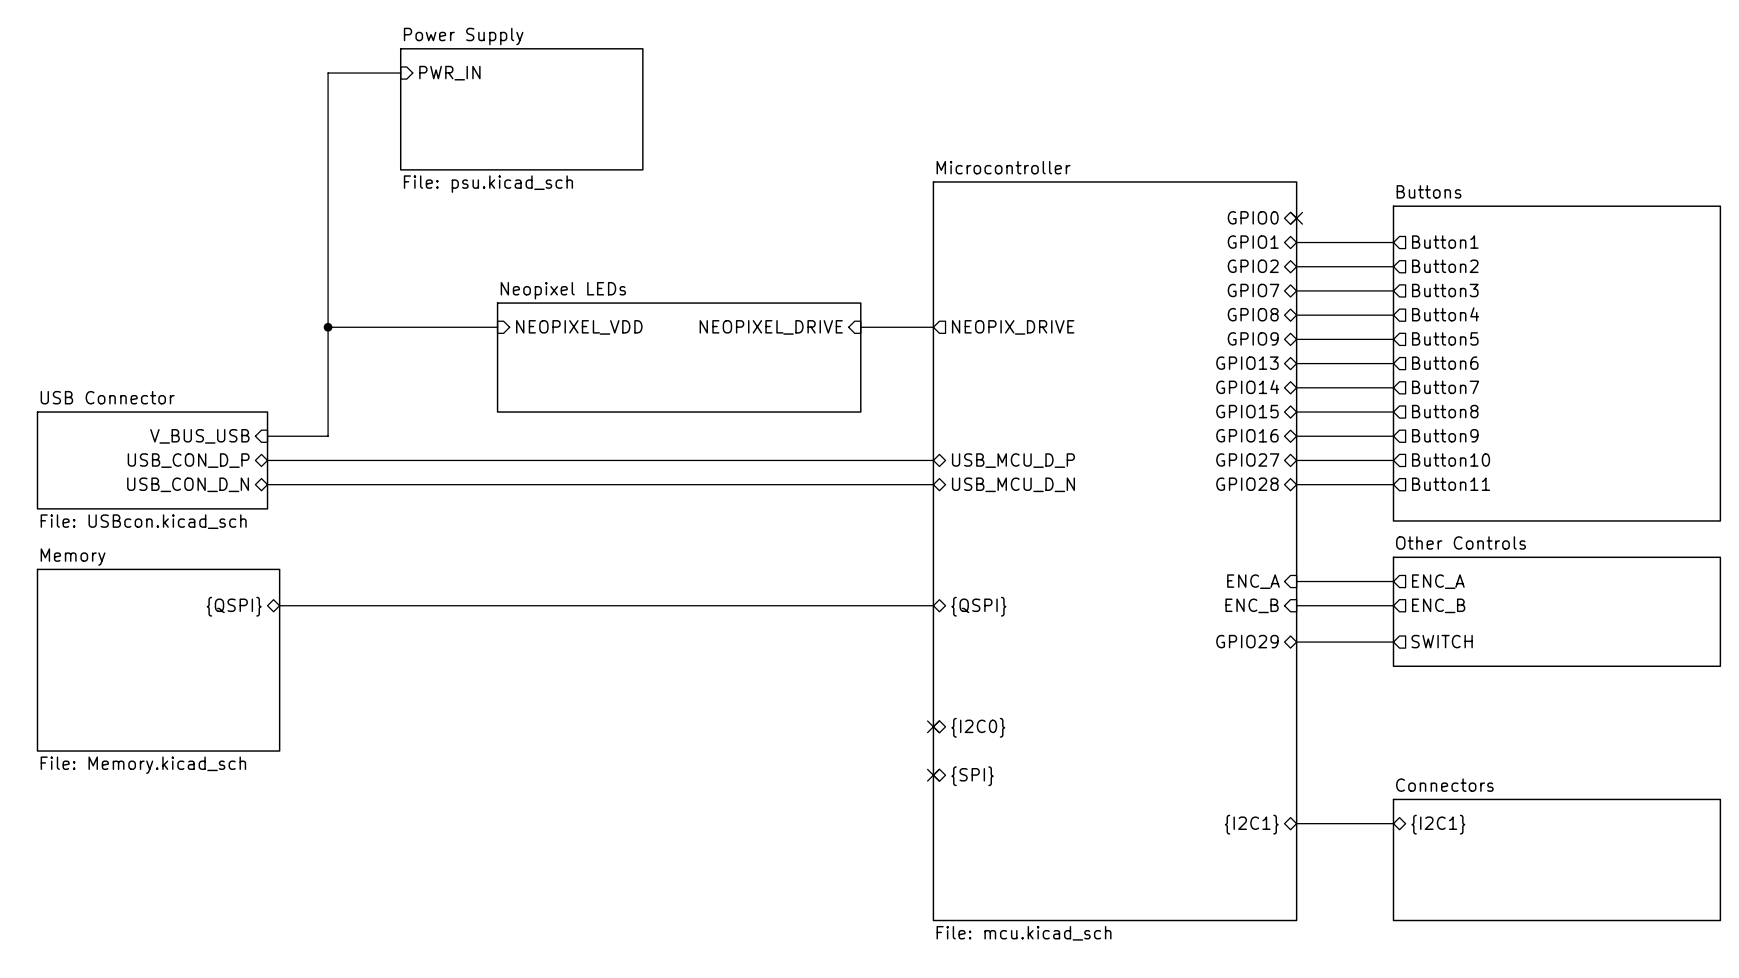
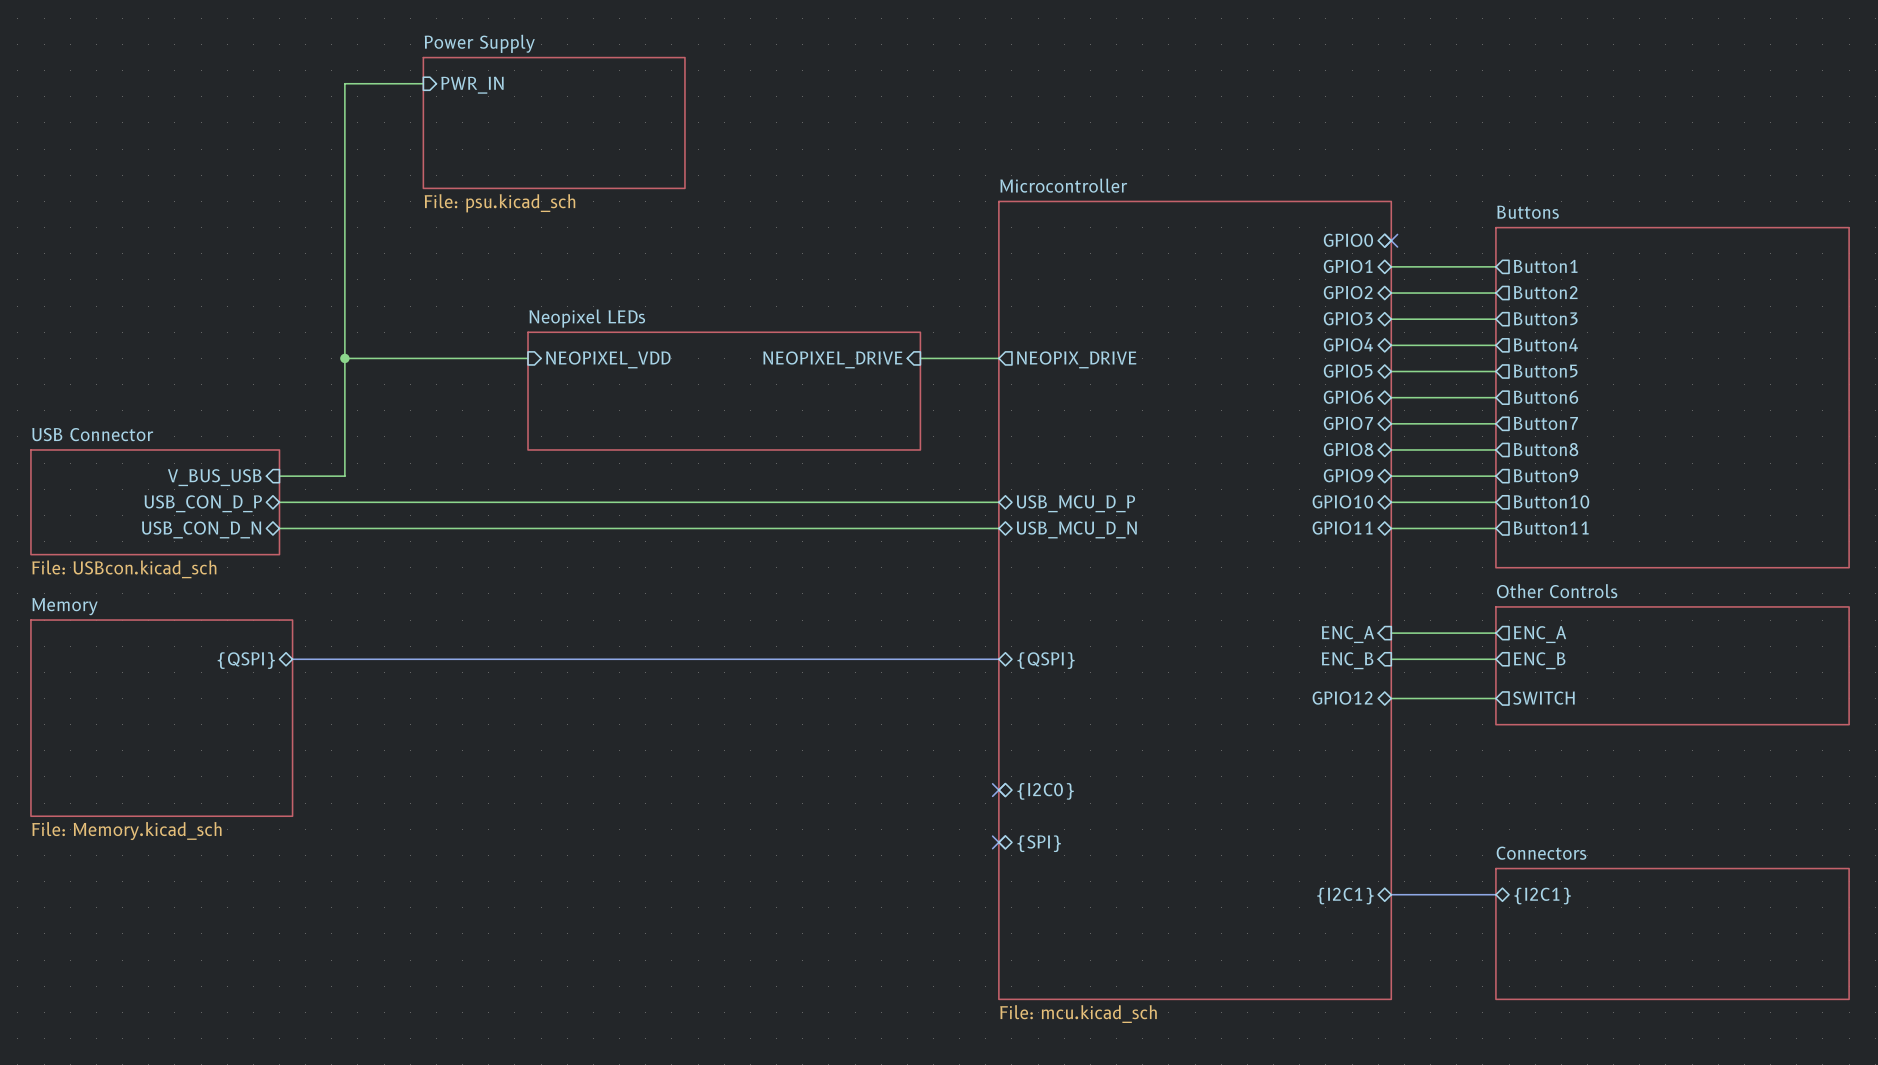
sheet pin: GPIO7 (1253, 290) -> GPIO3 (1348, 318)
sheet pin: GPIO8 (1253, 314) -> GPIO4 (1348, 344)
sheet pin: GPIO9 (1253, 338) -> GPIO5 (1348, 371)
sheet pin: GPIO13 (1247, 363) -> GPIO6 (1348, 397)
sheet pin: GPIO14 (1247, 387) -> GPIO7 (1348, 423)
sheet pin: GPIO15 (1247, 411) -> GPIO8 (1348, 449)
sheet pin: GPIO16 (1247, 435) -> GPIO9 (1348, 475)
sheet pin: GPIO27 (1247, 459) -> GPIO10 (1342, 501)
sheet pin: GPIO28 (1247, 484) -> GPIO11 (1342, 528)
sheet pin: GPIO29 (1247, 641) -> GPIO12 (1342, 698)

